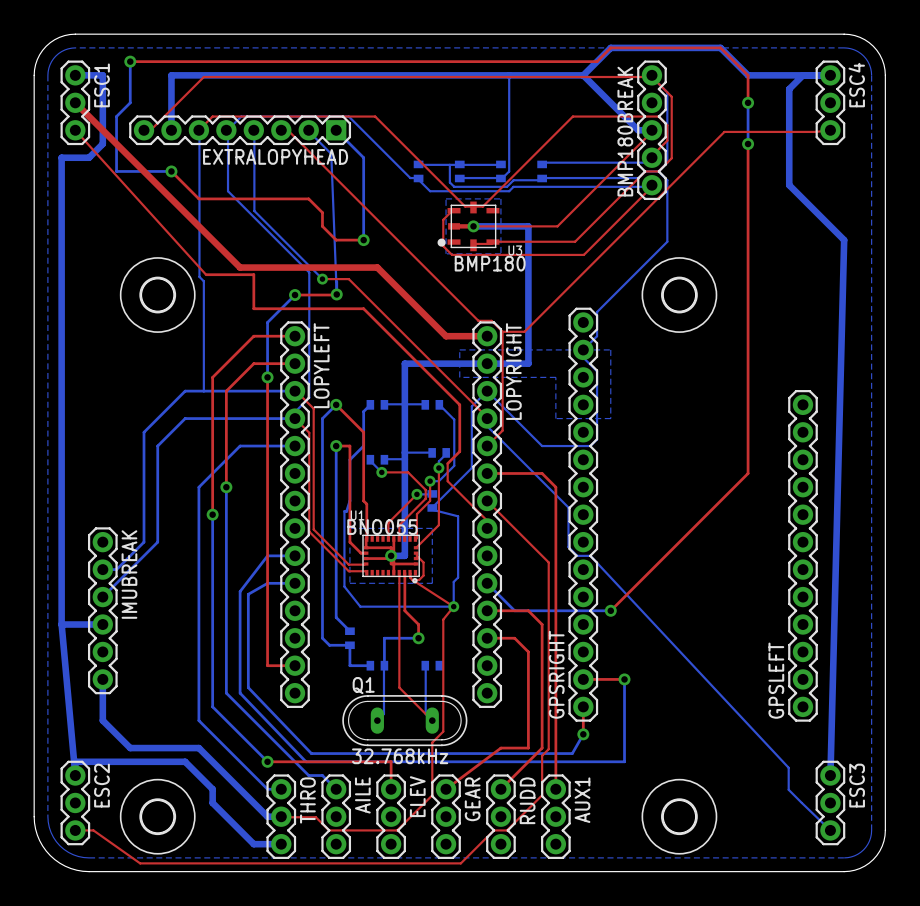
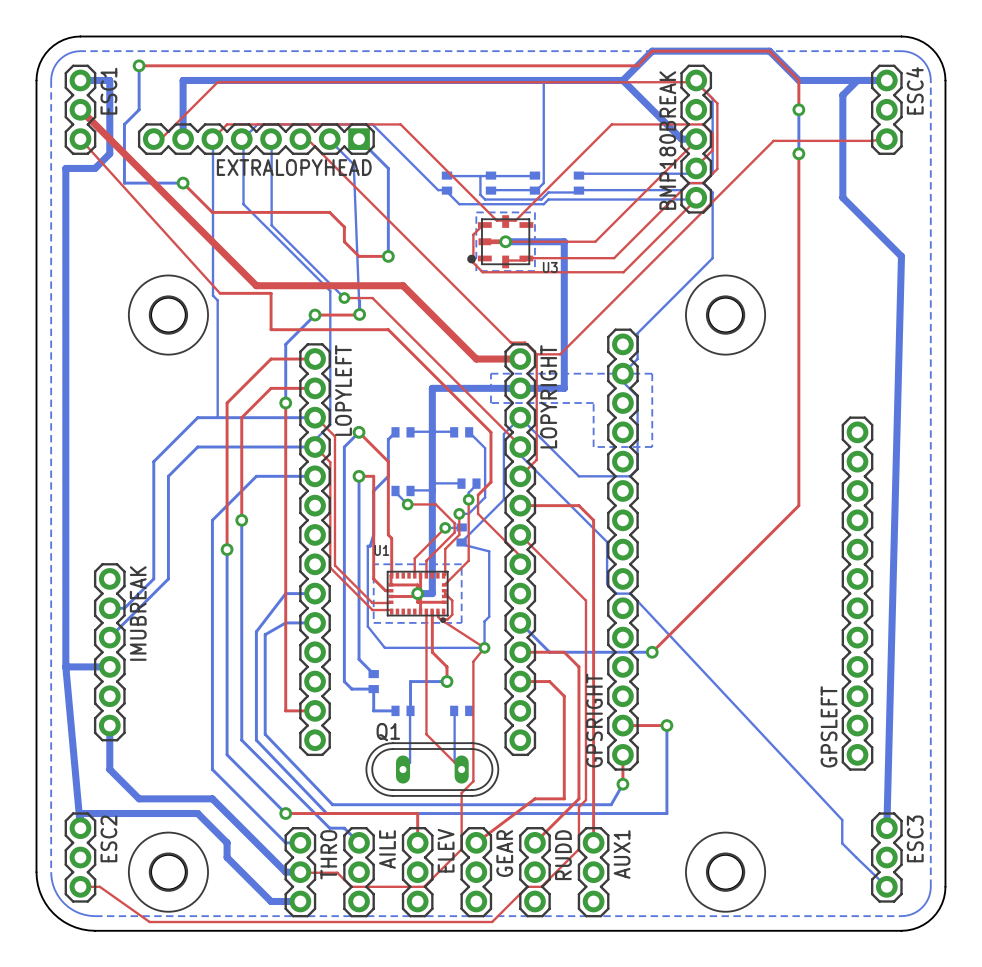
U3 value: BMP180 (490, 263) -> none
U1 value: BNO055 (382, 527) -> none
Q1 value: 32.768kHz (400, 756) -> none

